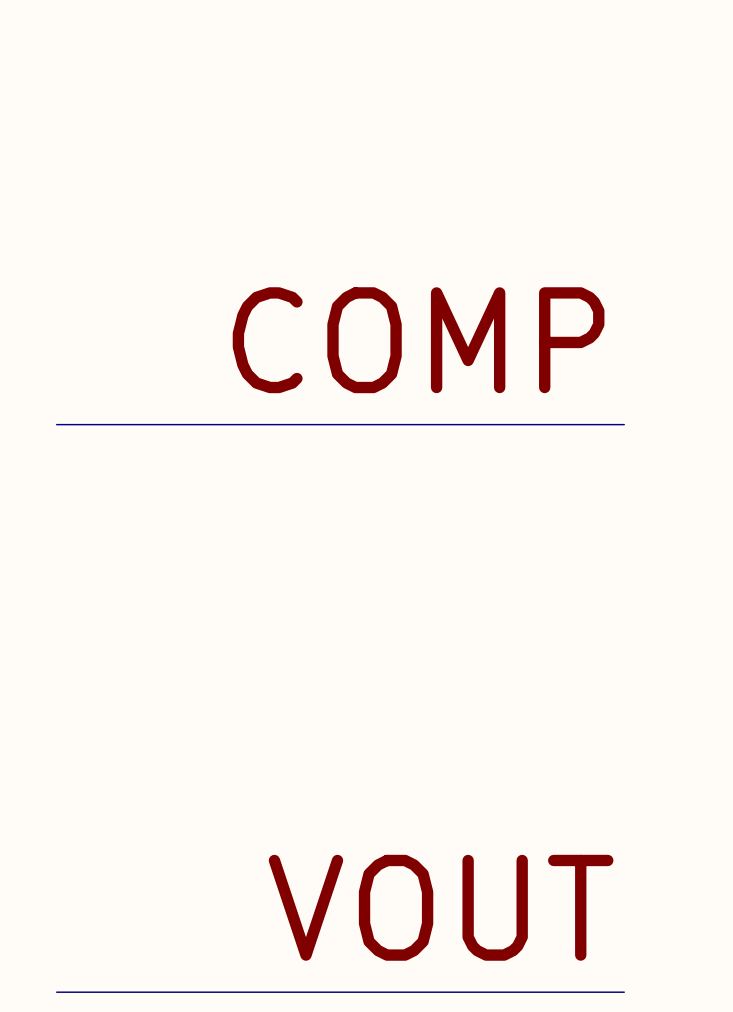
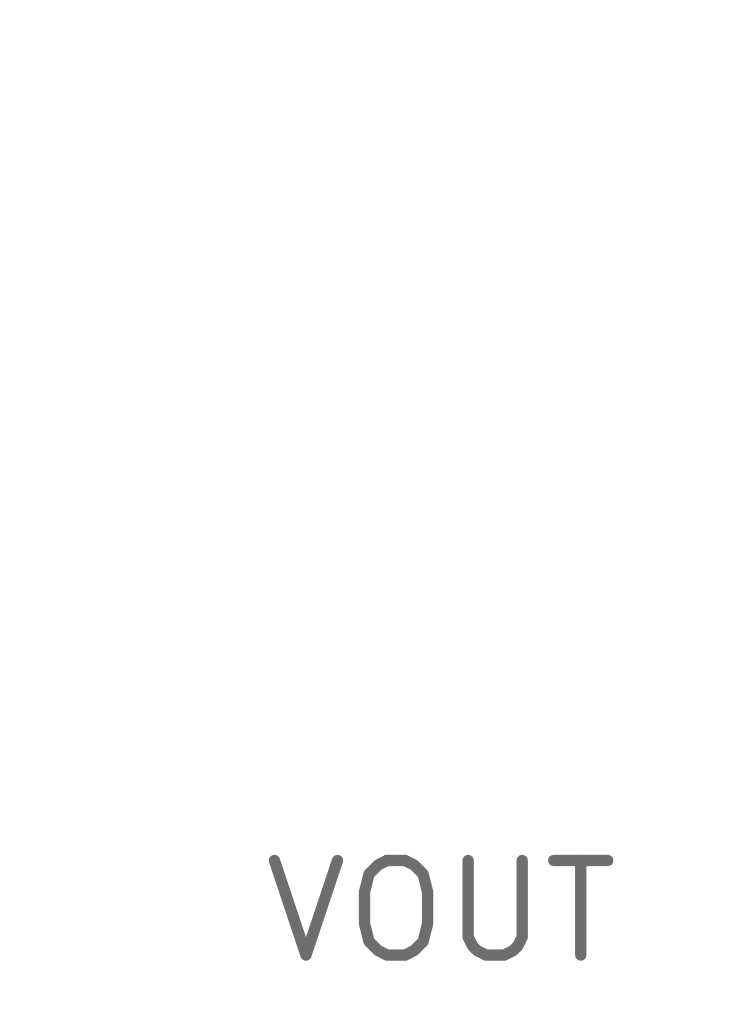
label: COMP (418, 340) -> none
wire: (56, 424) (624, 424) -> none
wire: (56, 992) (624, 992) -> none

